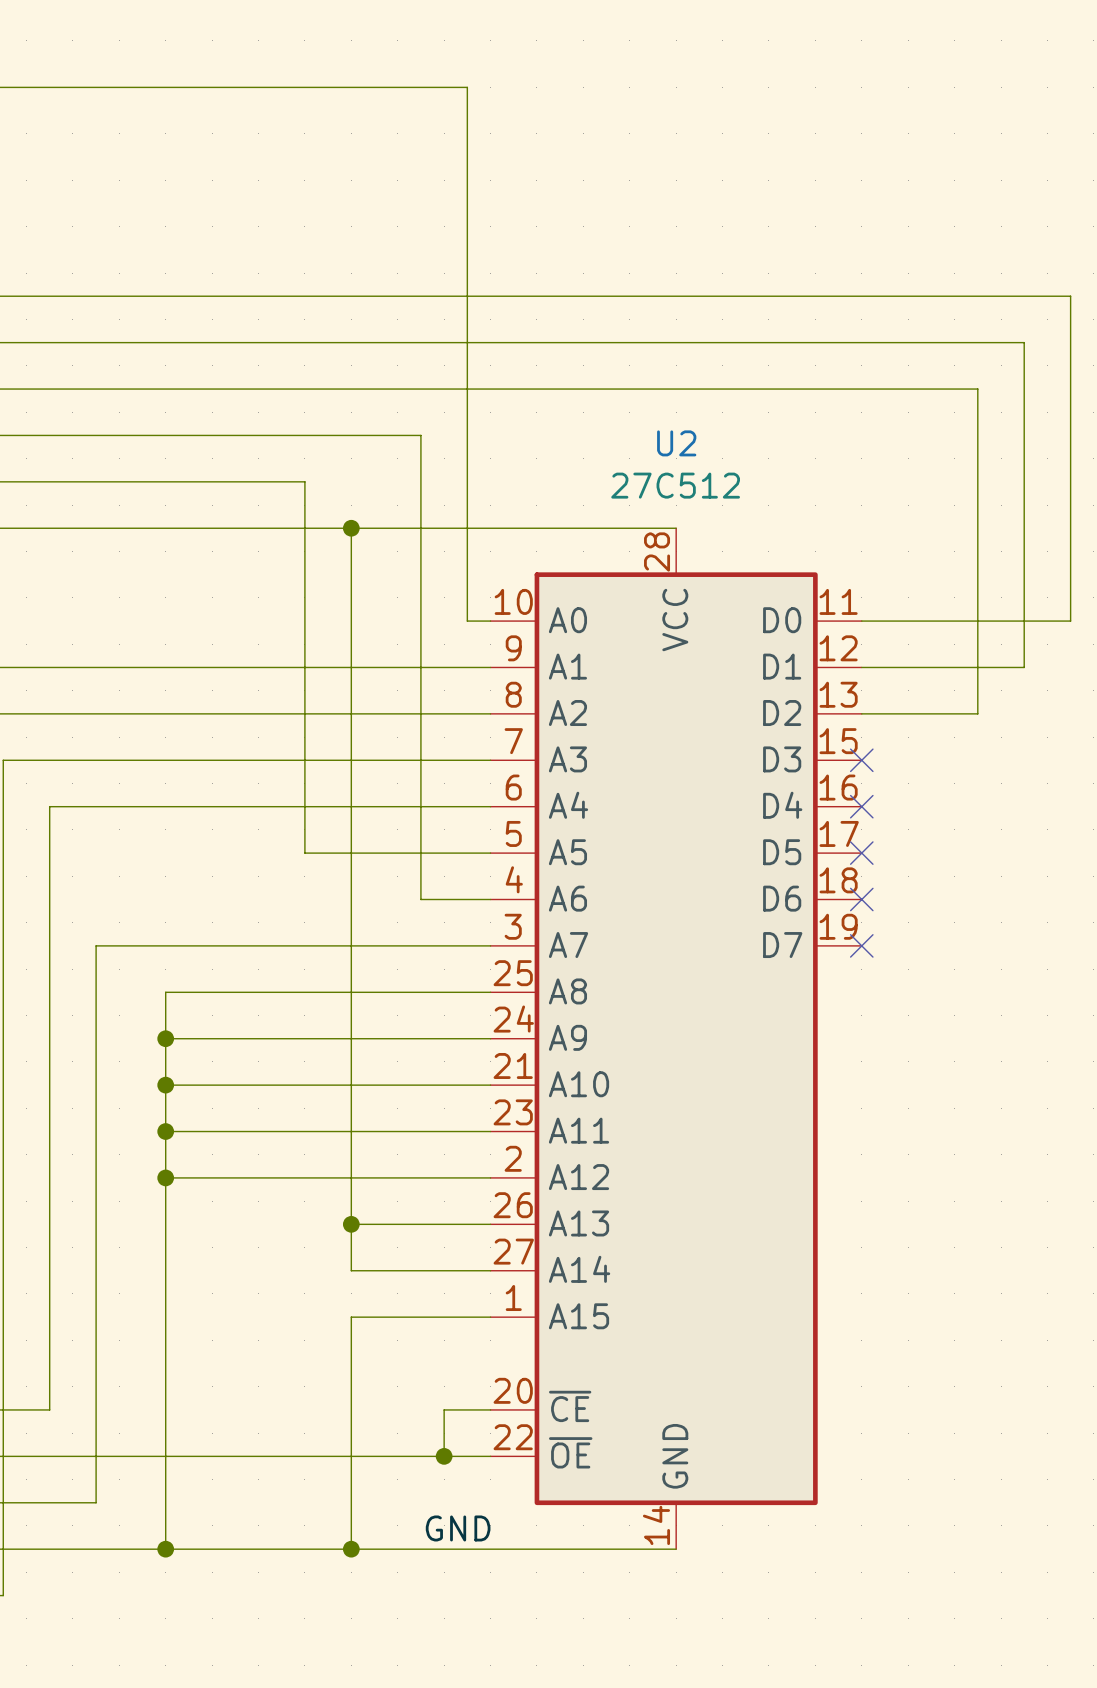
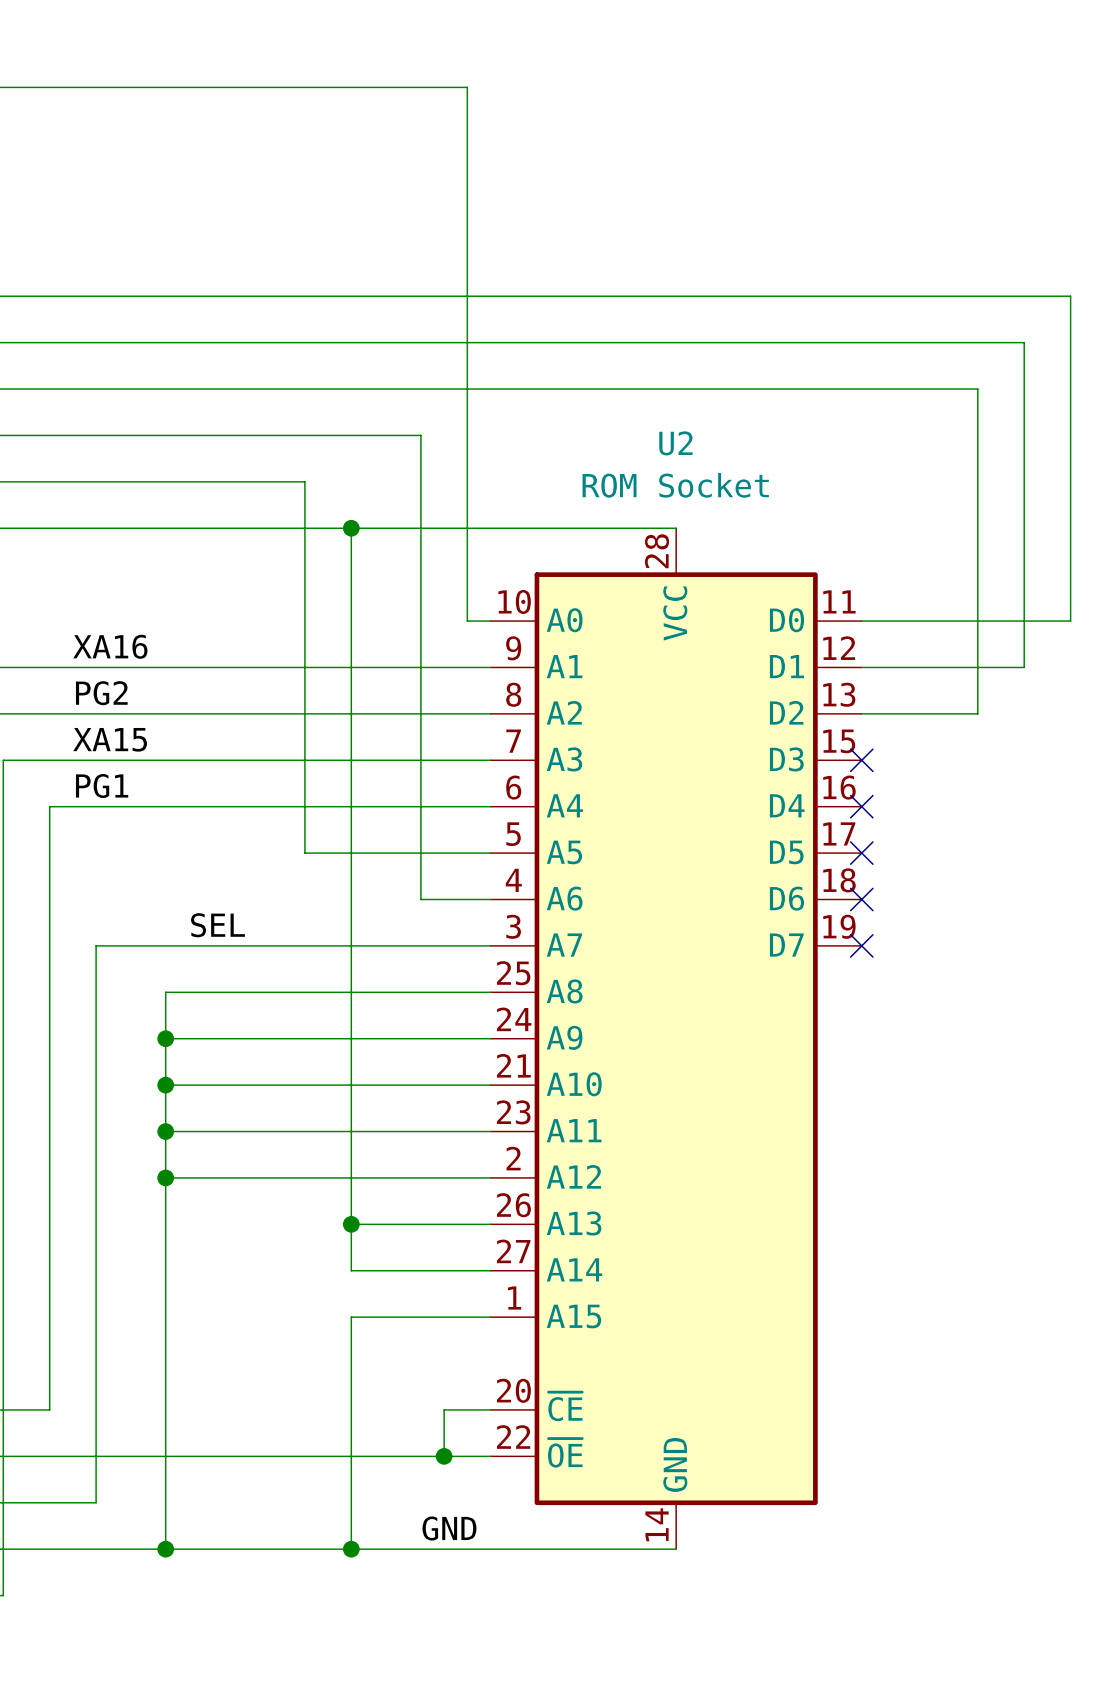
U2 value: 27C512 (675, 485) -> ROM Socket (675, 485)
label: none -> XA16 (110, 646)
label: none -> PG2 (101, 693)
label: none -> XA15 (110, 739)
label: none -> PG1 (102, 786)
label: none -> SEL (217, 925)

